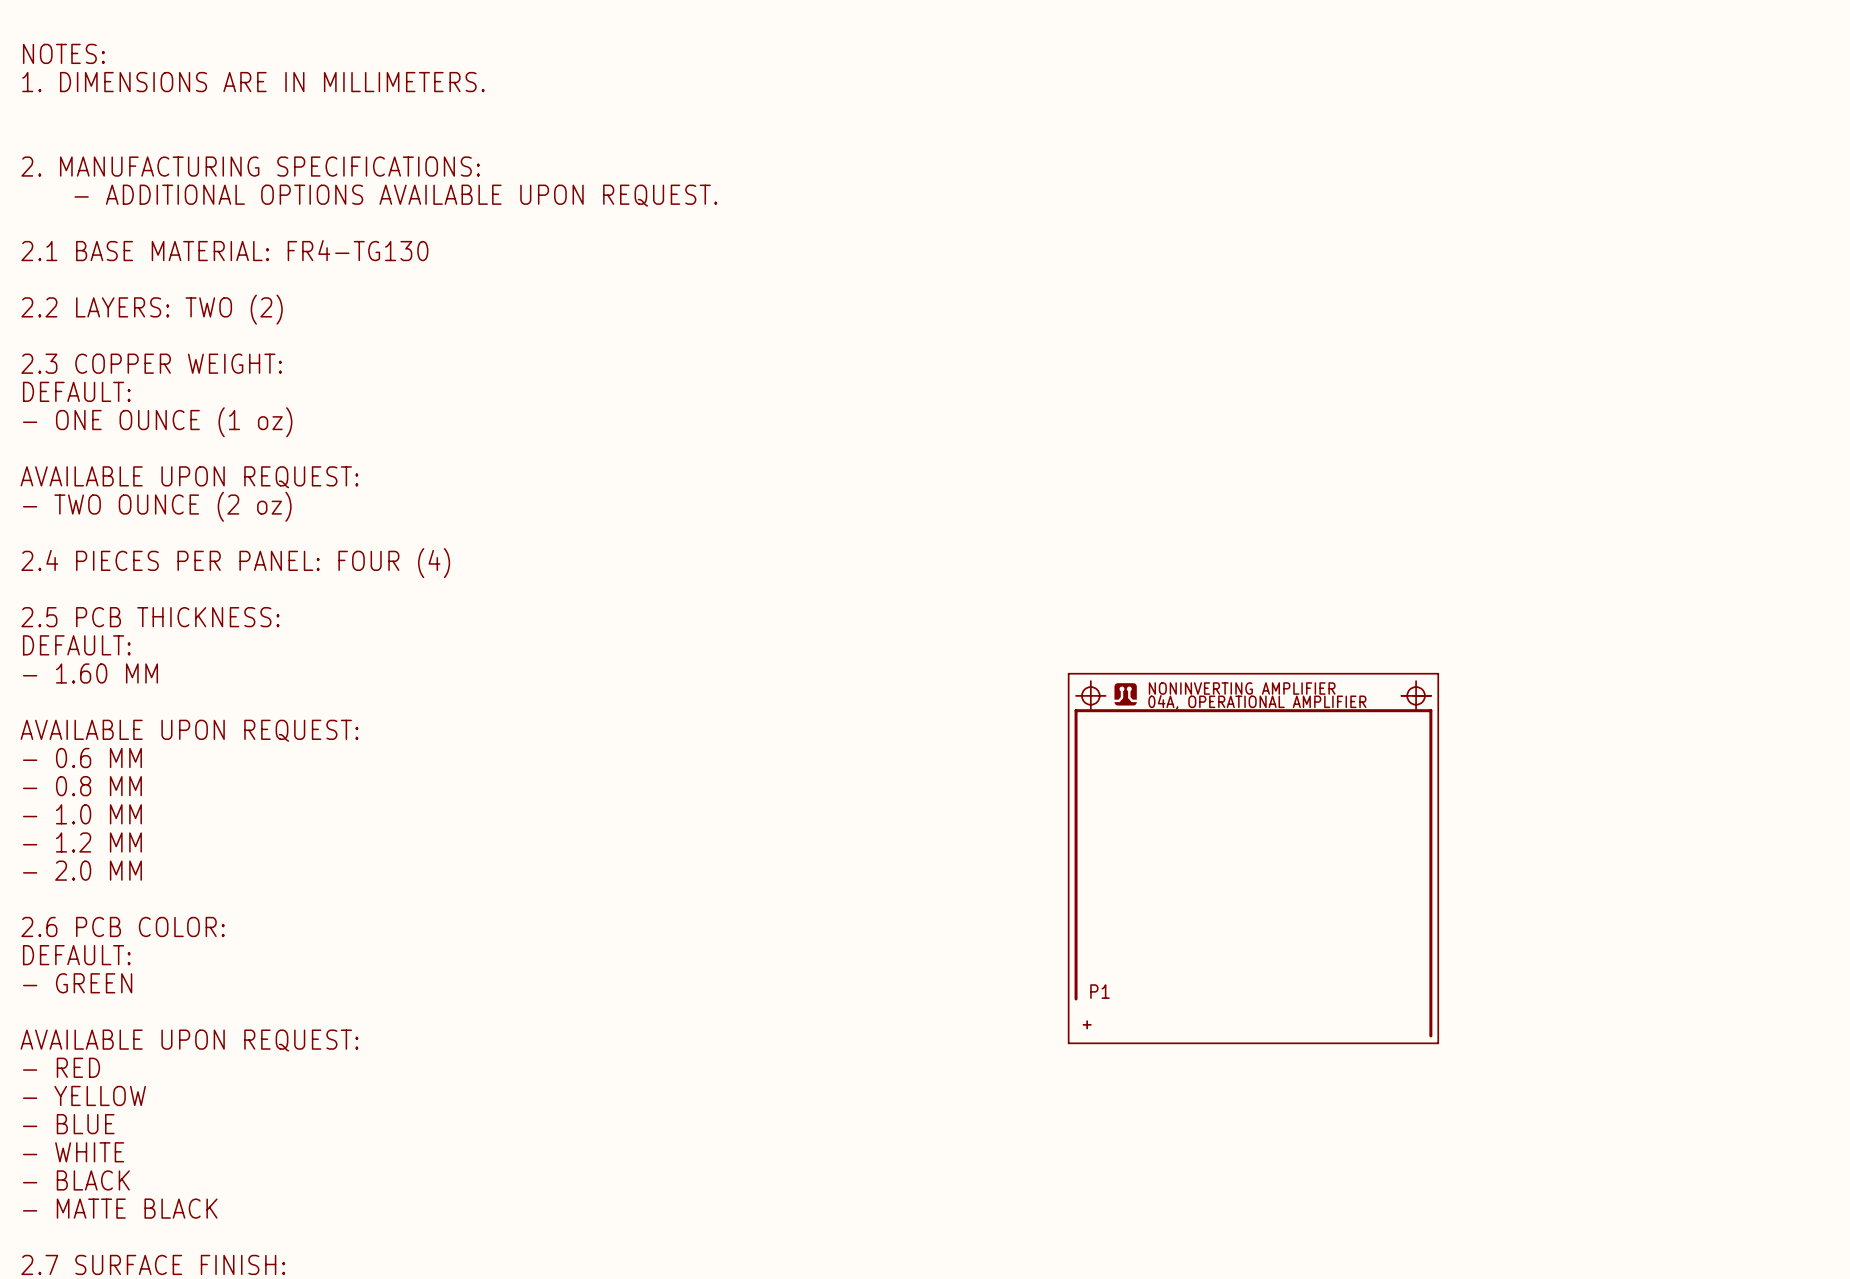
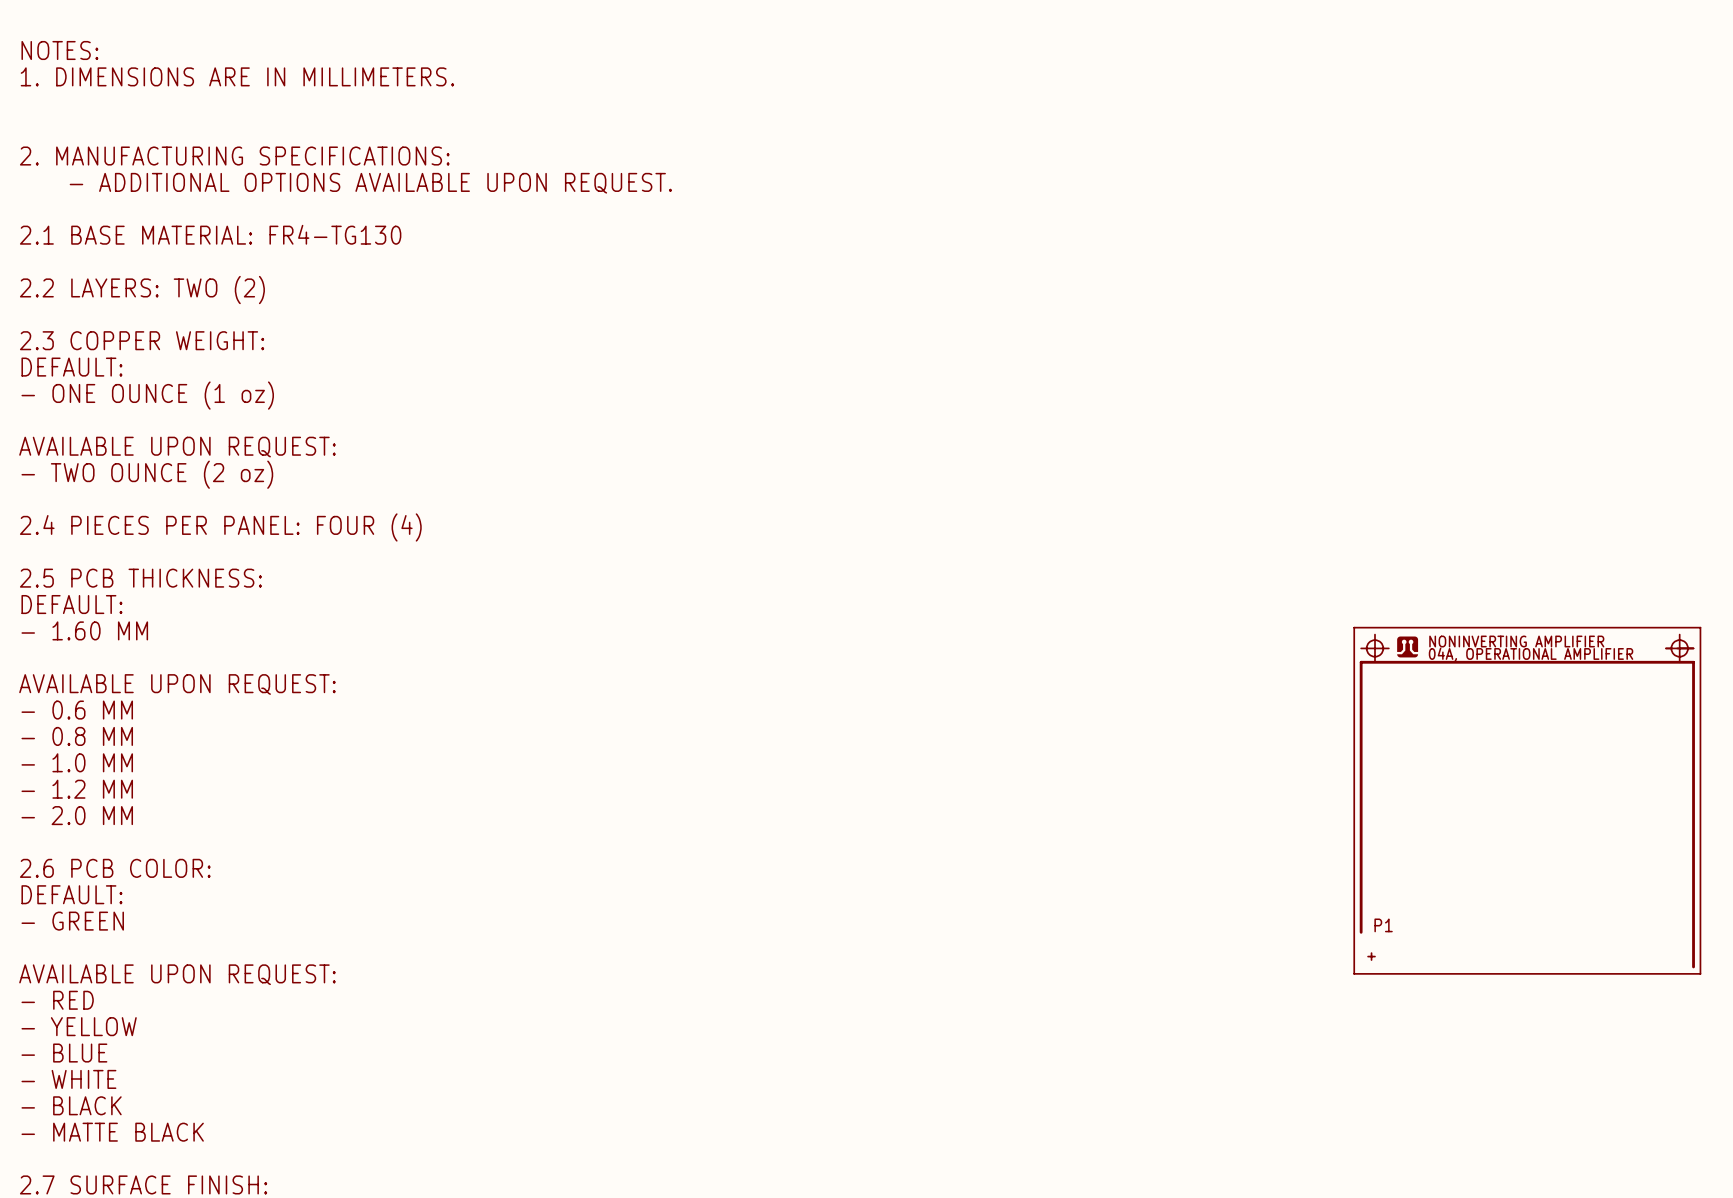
part: none -> (1527, 800)
part: (1253, 858) -> none

